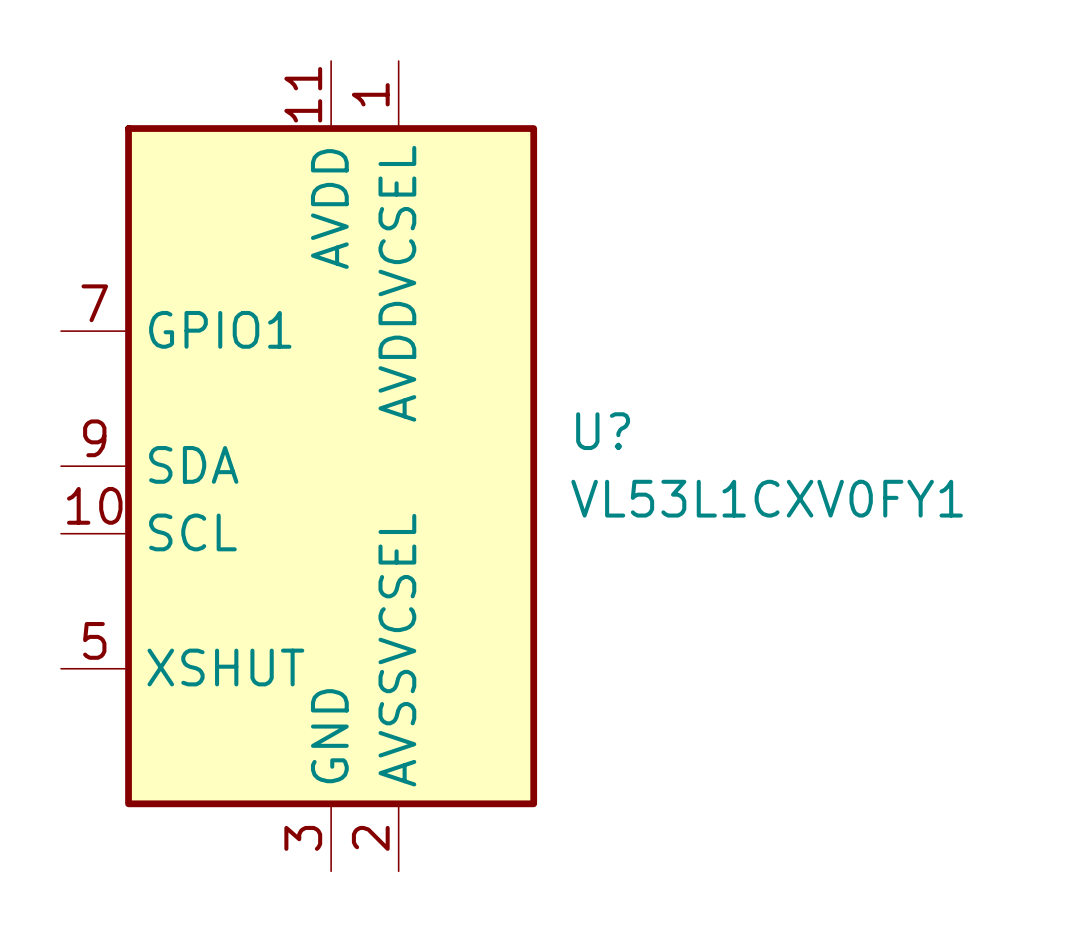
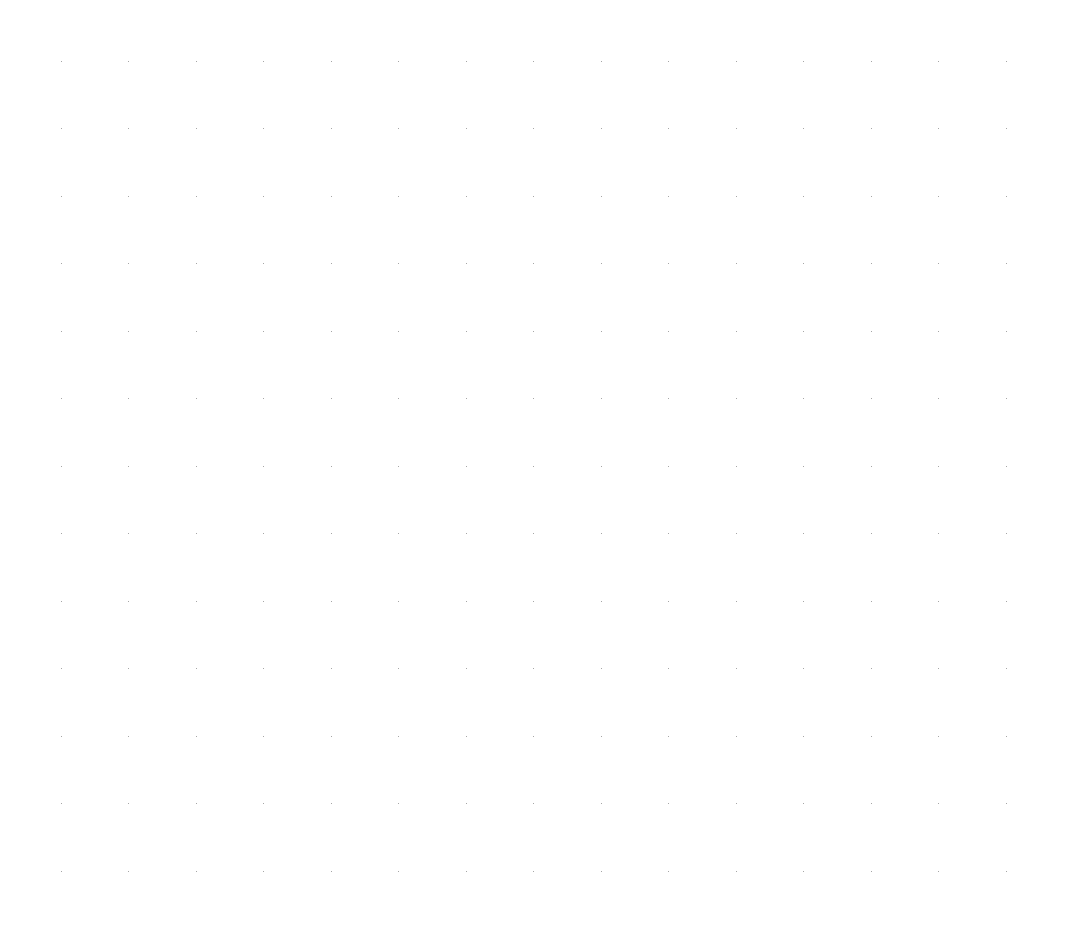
U?: VL53L1CXV0FY1 (299, 466) -> none

